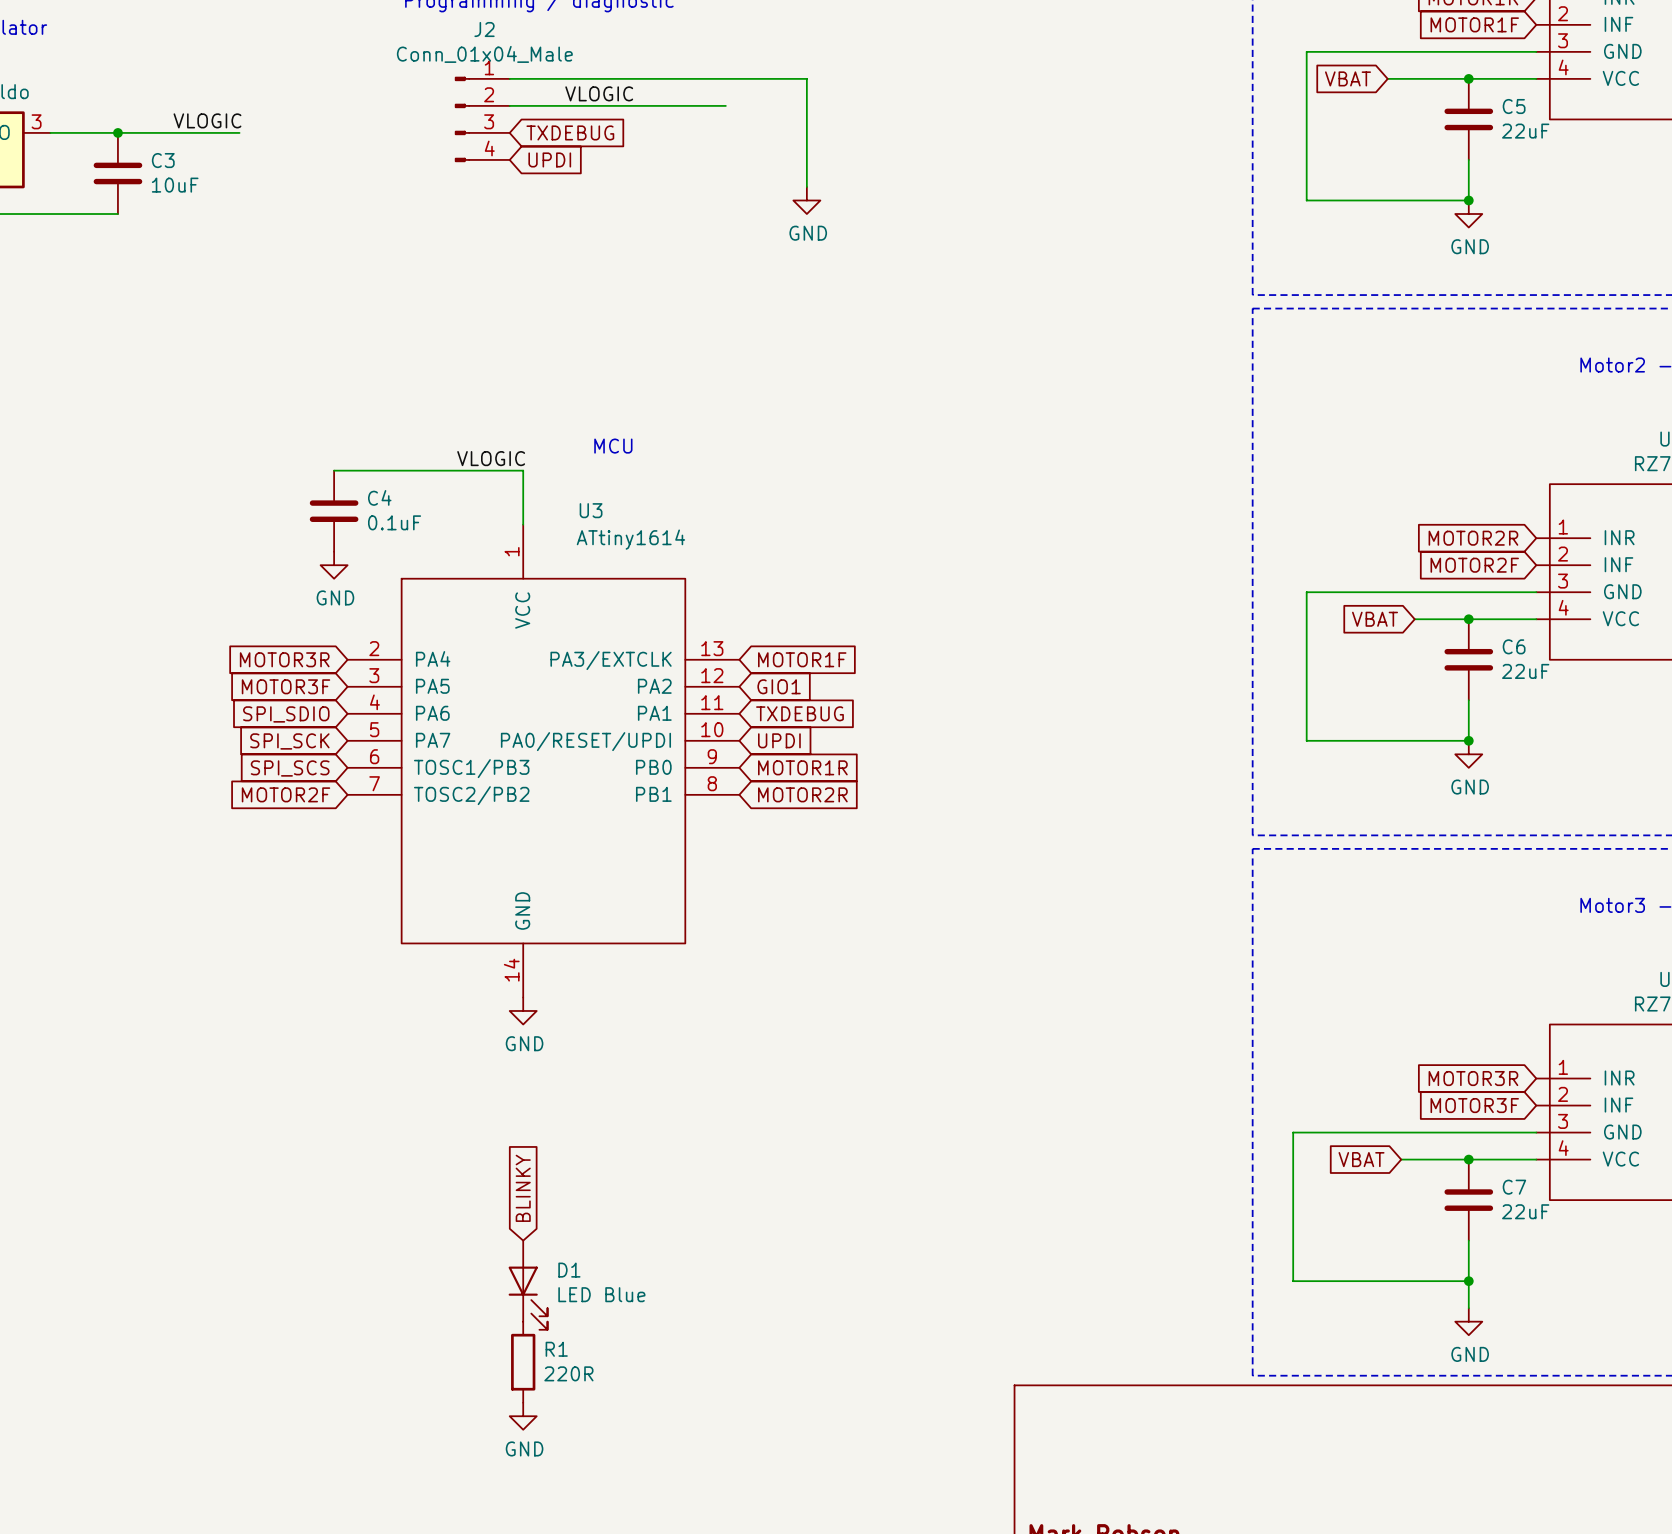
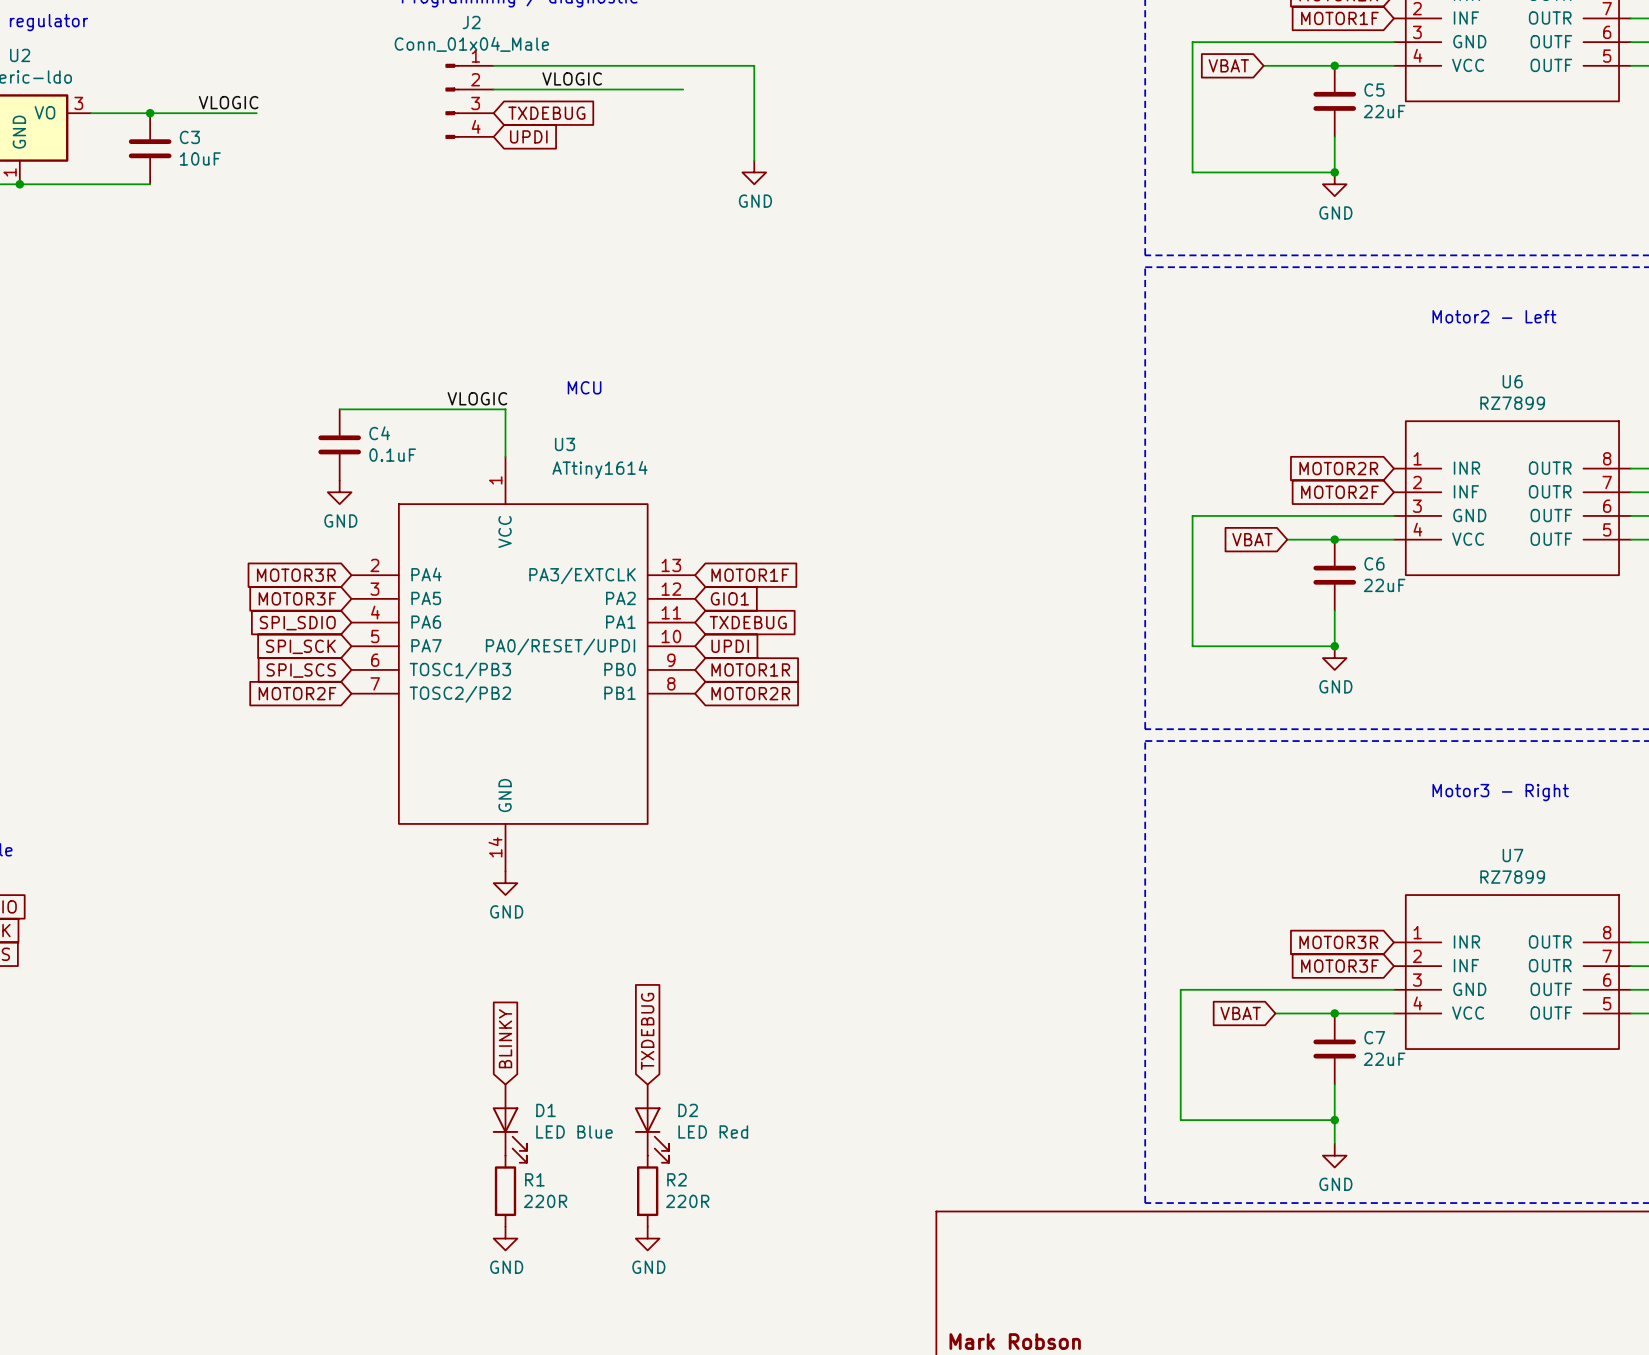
global label: none -> TXDEBUG (647, 1031)
D2: none -> LED Red (651, 1123)
R2: none -> 220R (647, 1191)
power symbol: none -> GND (647, 1238)

